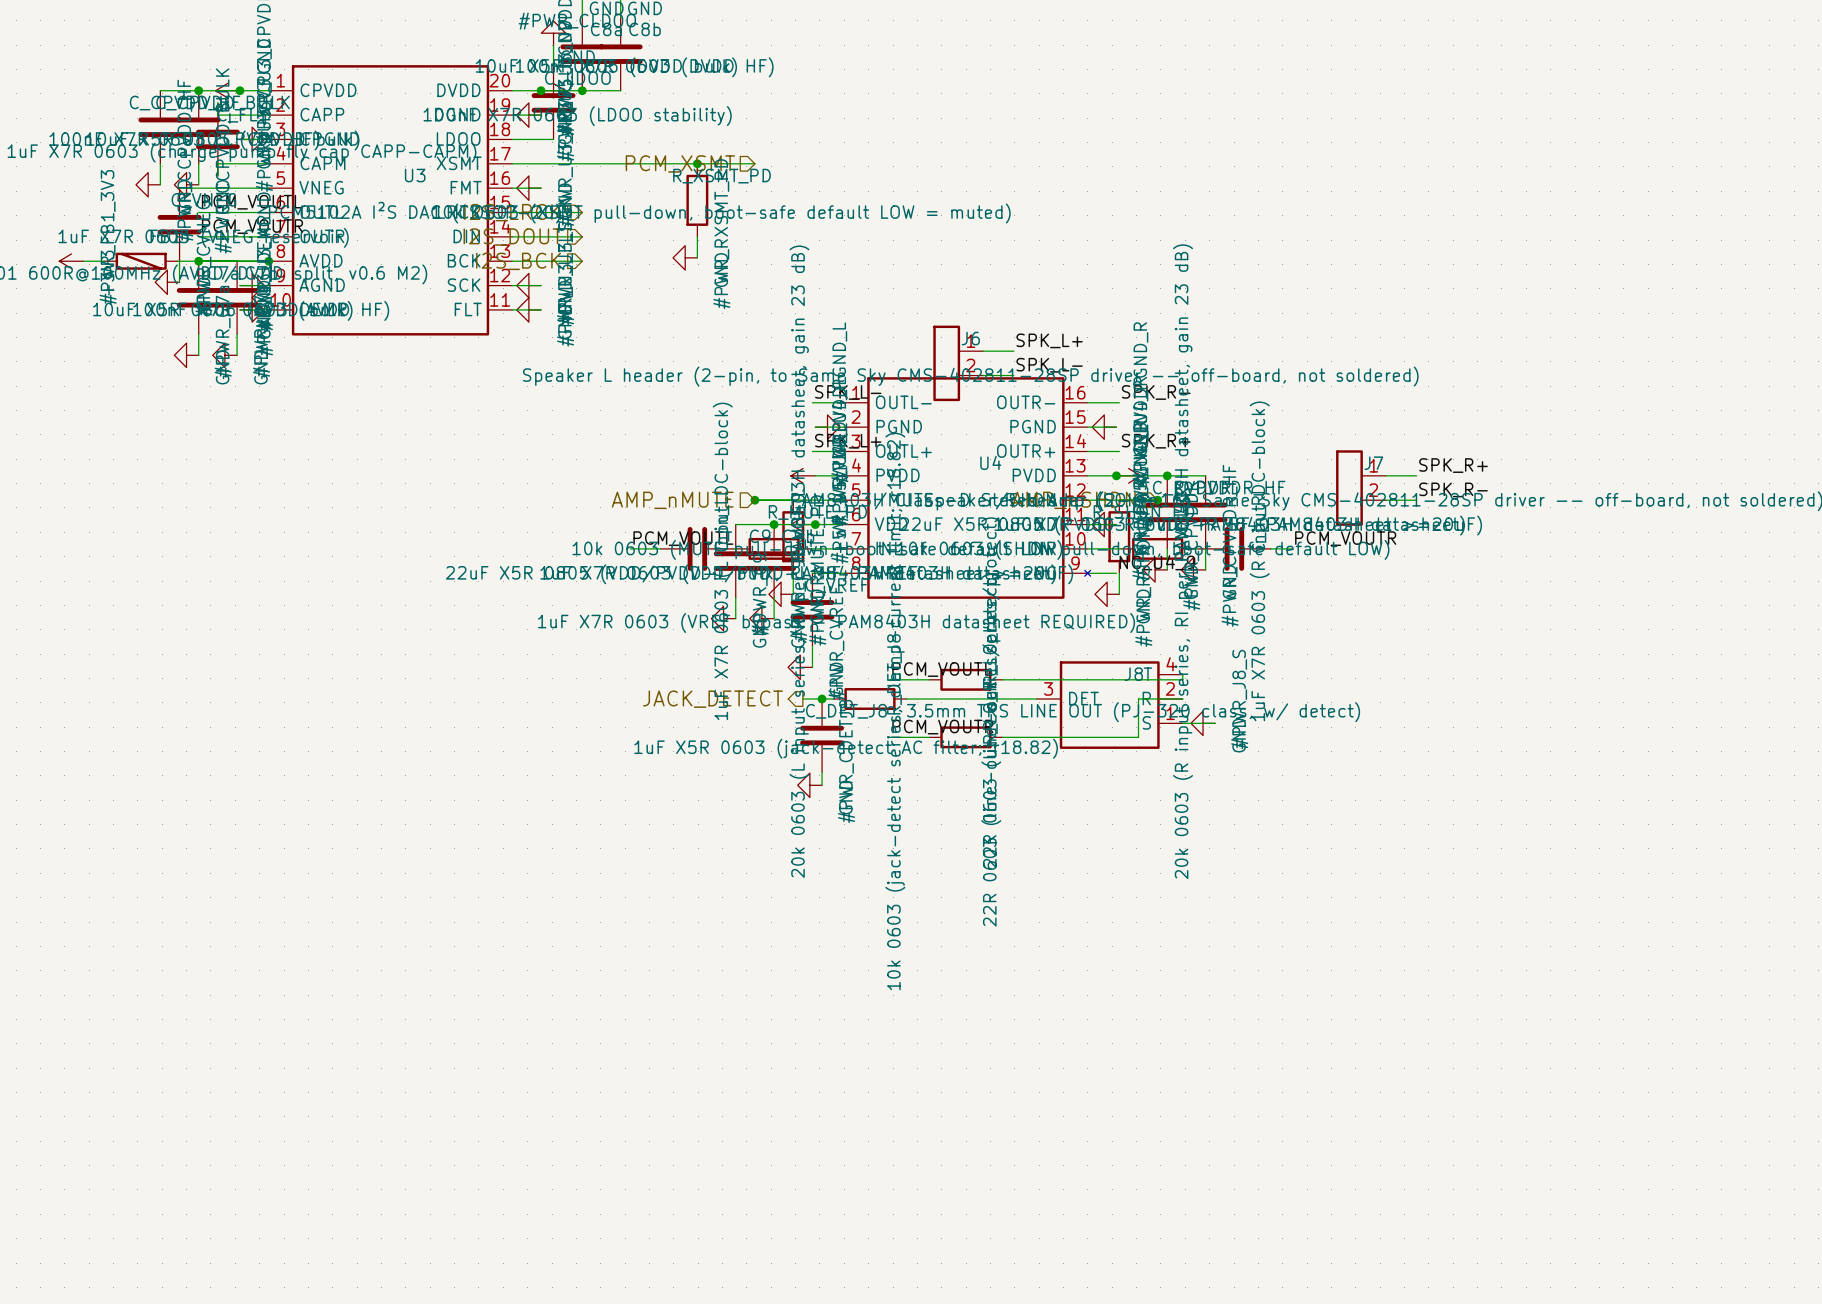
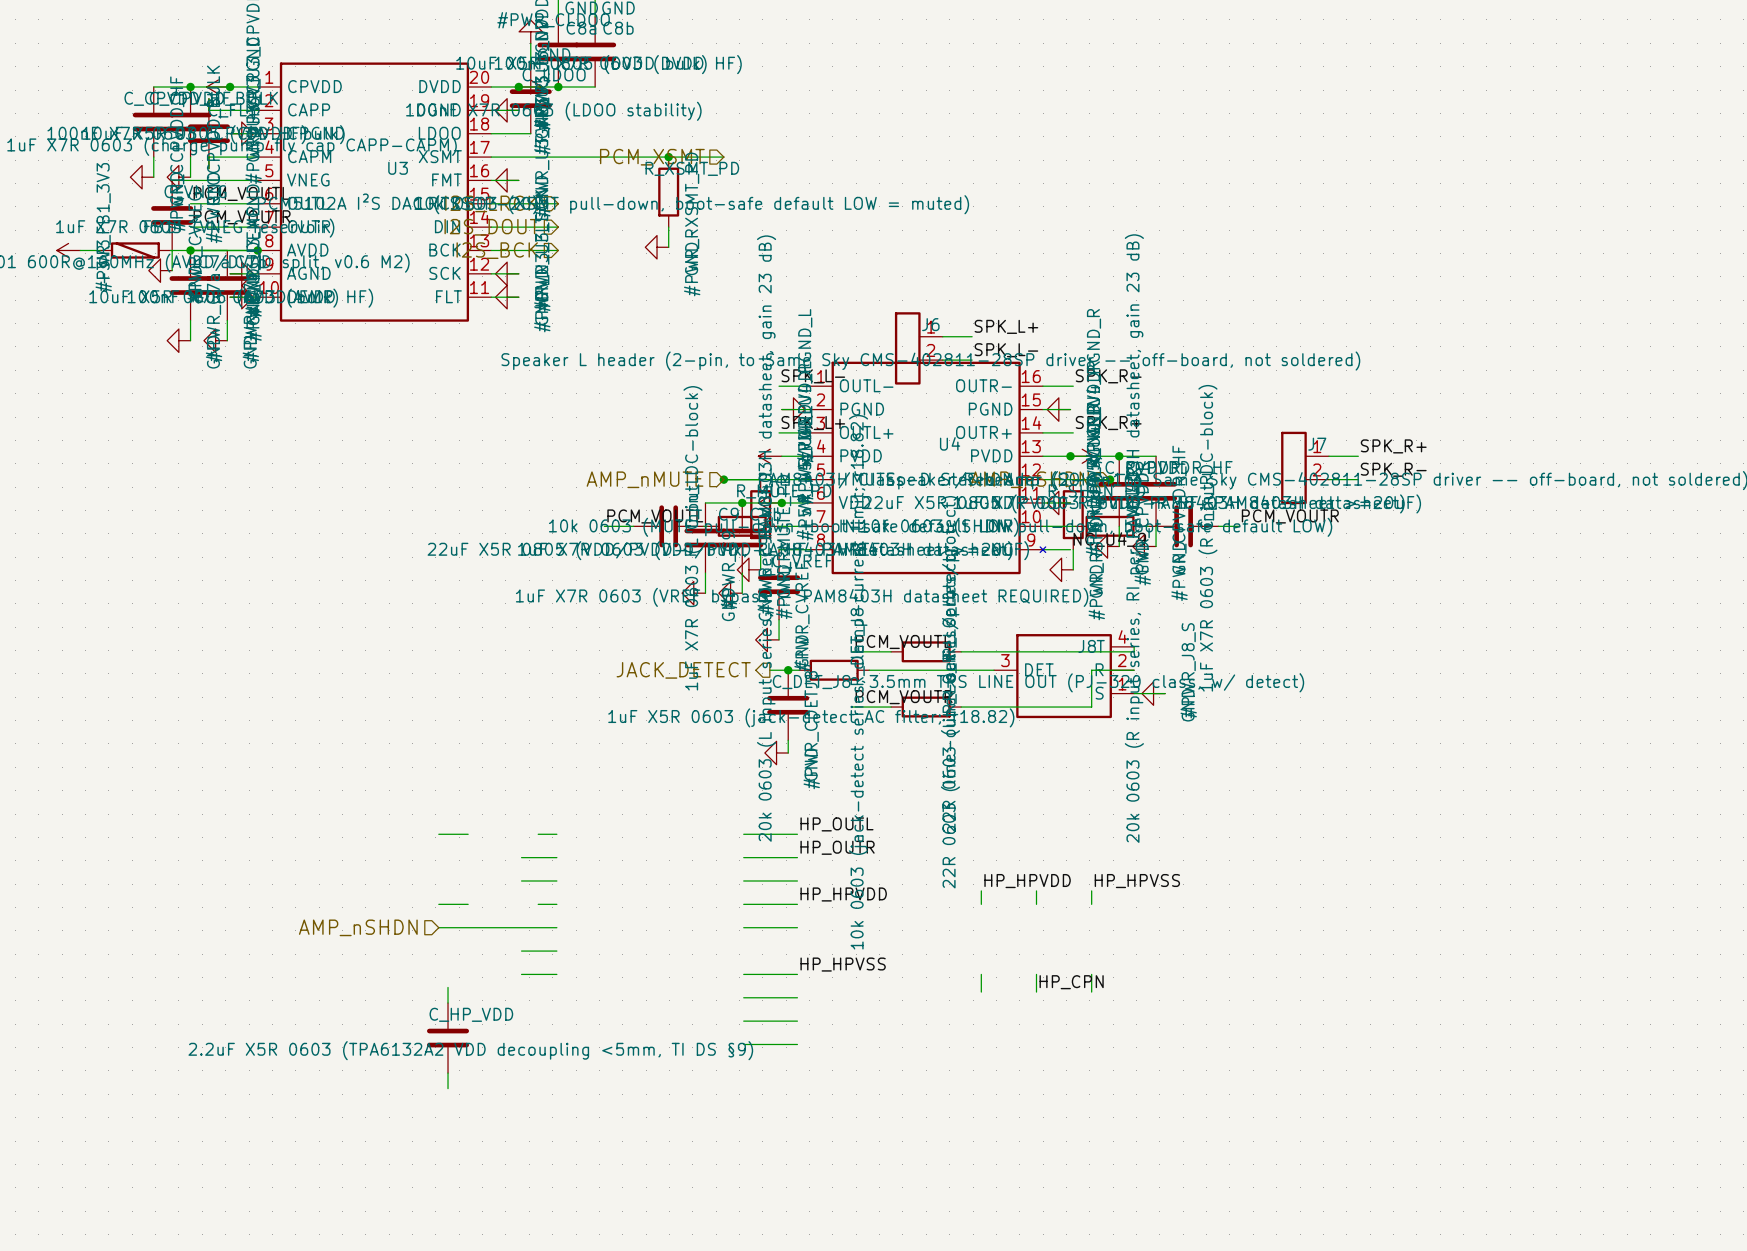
label: none -> HP_OUTL (836, 824)
wire: none -> (438, 834) (468, 834)
wire: none -> (538, 834) (556, 834)
wire: none -> (743, 834) (797, 834)
label: none -> HP_OUTR (837, 847)
wire: none -> (521, 857) (556, 857)
wire: none -> (743, 857) (797, 857)
wire: none -> (521, 880) (556, 880)
wire: none -> (743, 880) (797, 880)
label: none -> HP_HPVDD (1027, 881)
label: none -> HP_HPVSS (1137, 881)
wire: none -> (981, 890) (981, 904)
wire: none -> (1036, 890) (1036, 904)
wire: none -> (1091, 890) (1091, 904)
label: none -> HP_HPVDD (843, 894)
wire: none -> (438, 904) (468, 904)
wire: none -> (538, 904) (556, 904)
wire: none -> (743, 904) (797, 904)
hierarchical label: none -> AMP_nSHDN (358, 927)
wire: none -> (438, 927) (556, 927)
wire: none -> (743, 927) (797, 927)
wire: none -> (521, 951) (556, 951)
label: none -> HP_HPVSS (843, 964)
wire: none -> (521, 974) (556, 974)
wire: none -> (743, 974) (797, 974)
wire: none -> (981, 974) (981, 992)
wire: none -> (1036, 974) (1036, 992)
wire: none -> (1091, 974) (1091, 992)
label: none -> HP_CPN (1071, 982)
wire: none -> (448, 987) (448, 1003)
wire: none -> (743, 997) (797, 997)
wire: none -> (743, 1021) (797, 1021)
C_HP_VDD: none -> 2.2uF X5R 0603 (TPA6132A2 VDD decoupling <5mm, TI DS §9) (448, 1038)
wire: none -> (743, 1044) (797, 1044)
wire: none -> (448, 1073) (448, 1088)

